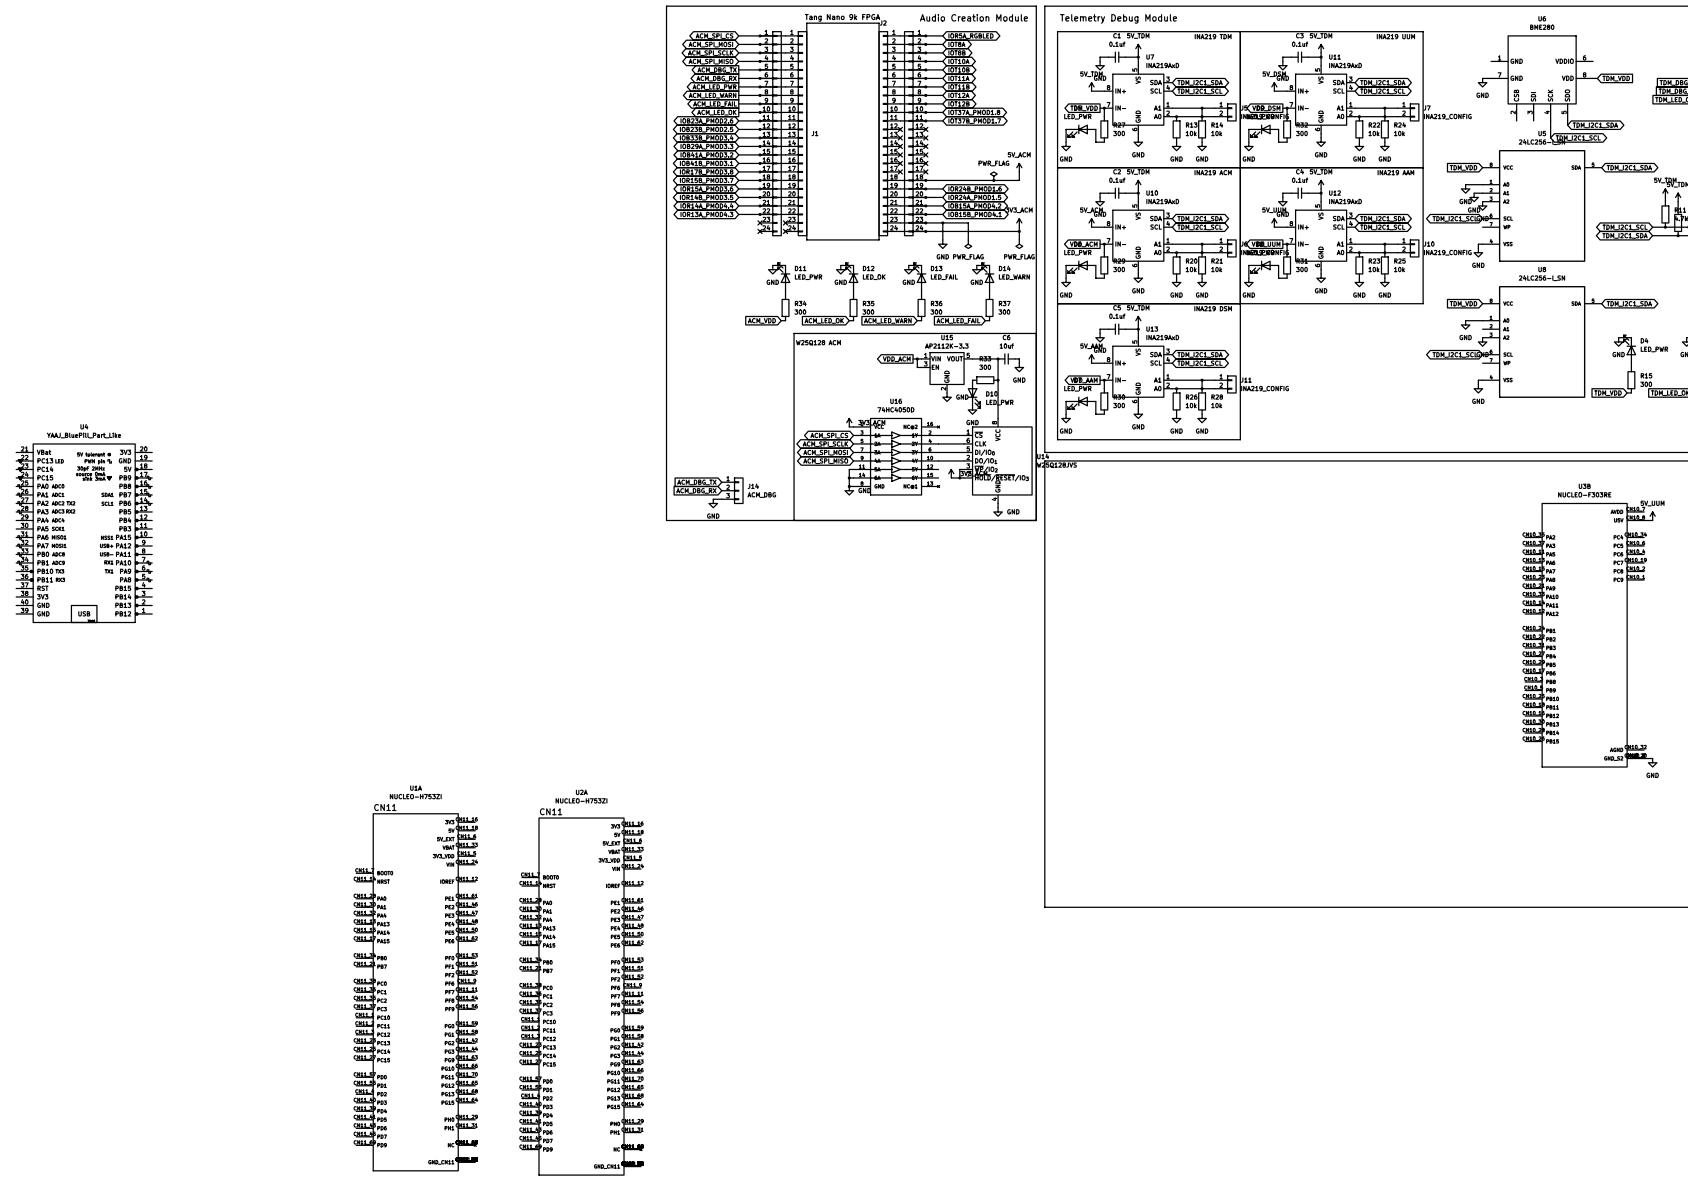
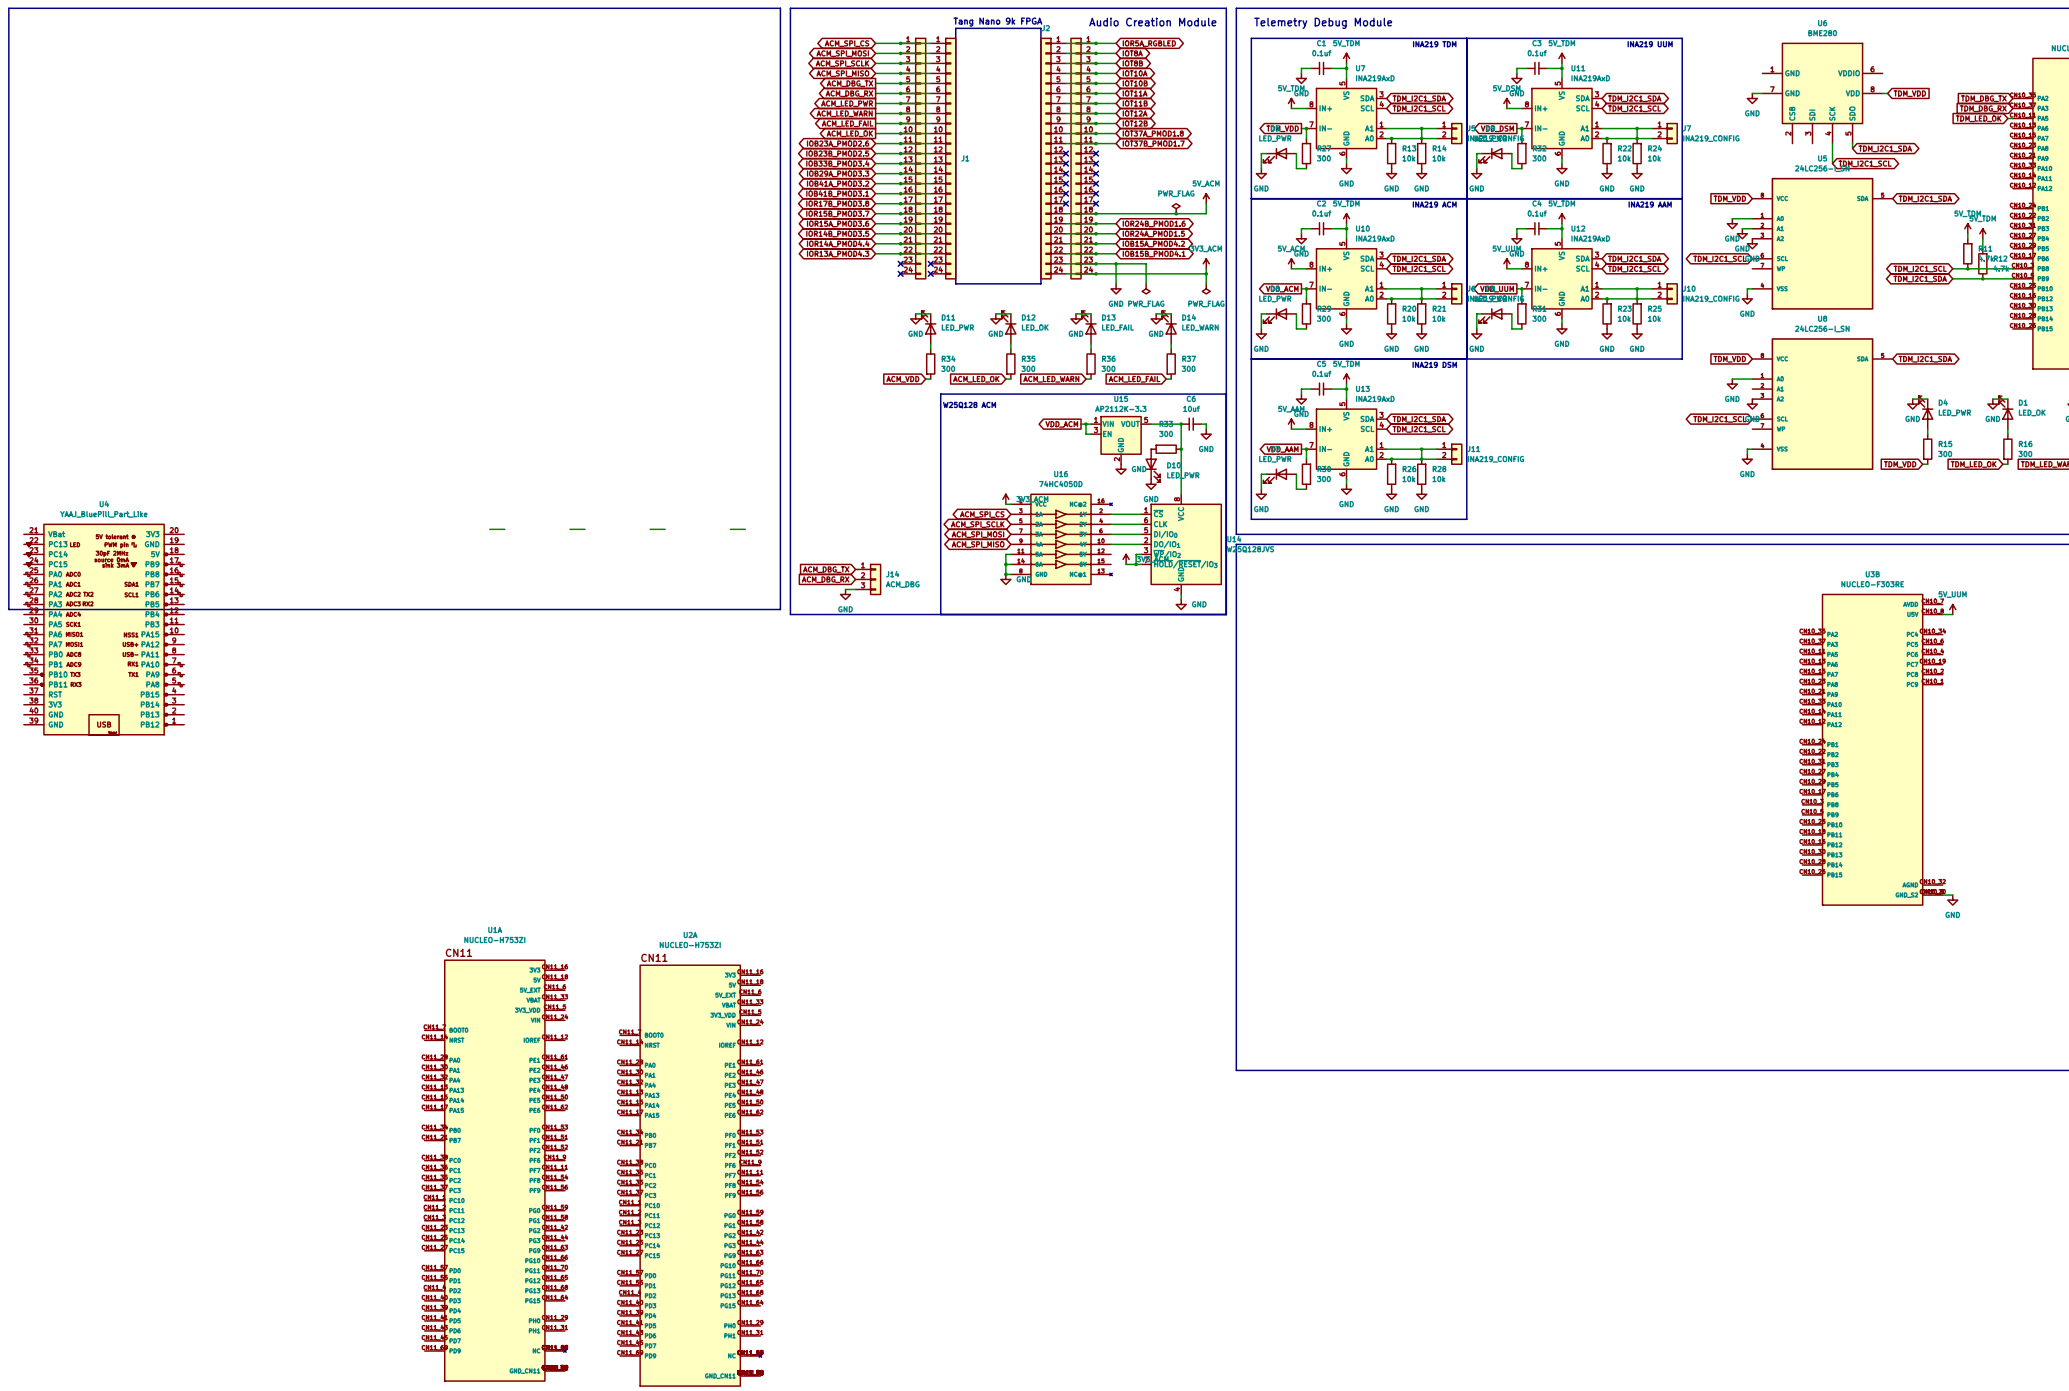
line: none -> (8, 8) (780, 8) (780, 609) (8, 609) (8, 8)
wire: none -> (489, 529) (504, 529)
wire: none -> (569, 529) (585, 529)
wire: none -> (650, 529) (665, 529)
wire: none -> (730, 529) (745, 529)

